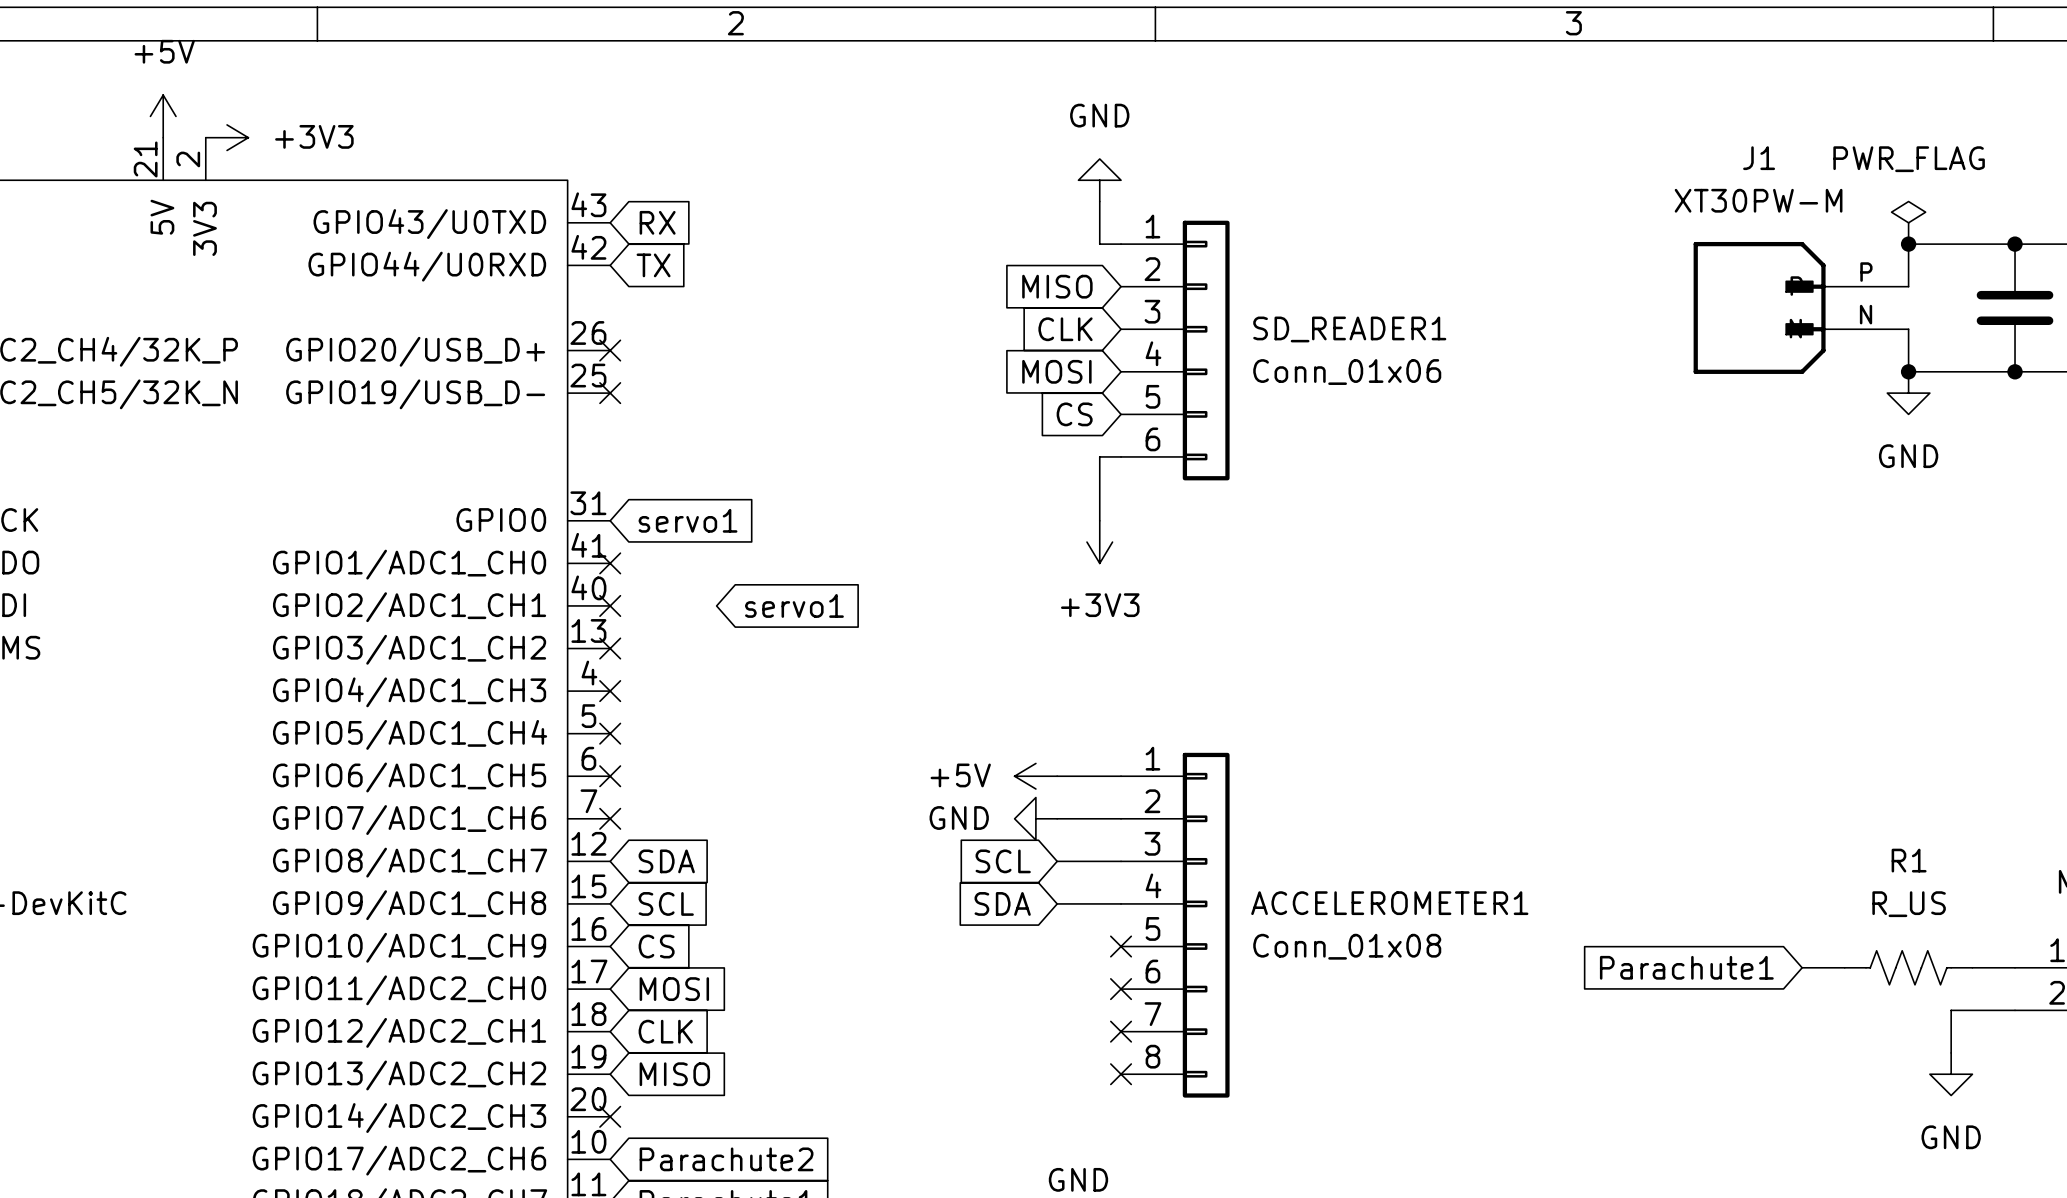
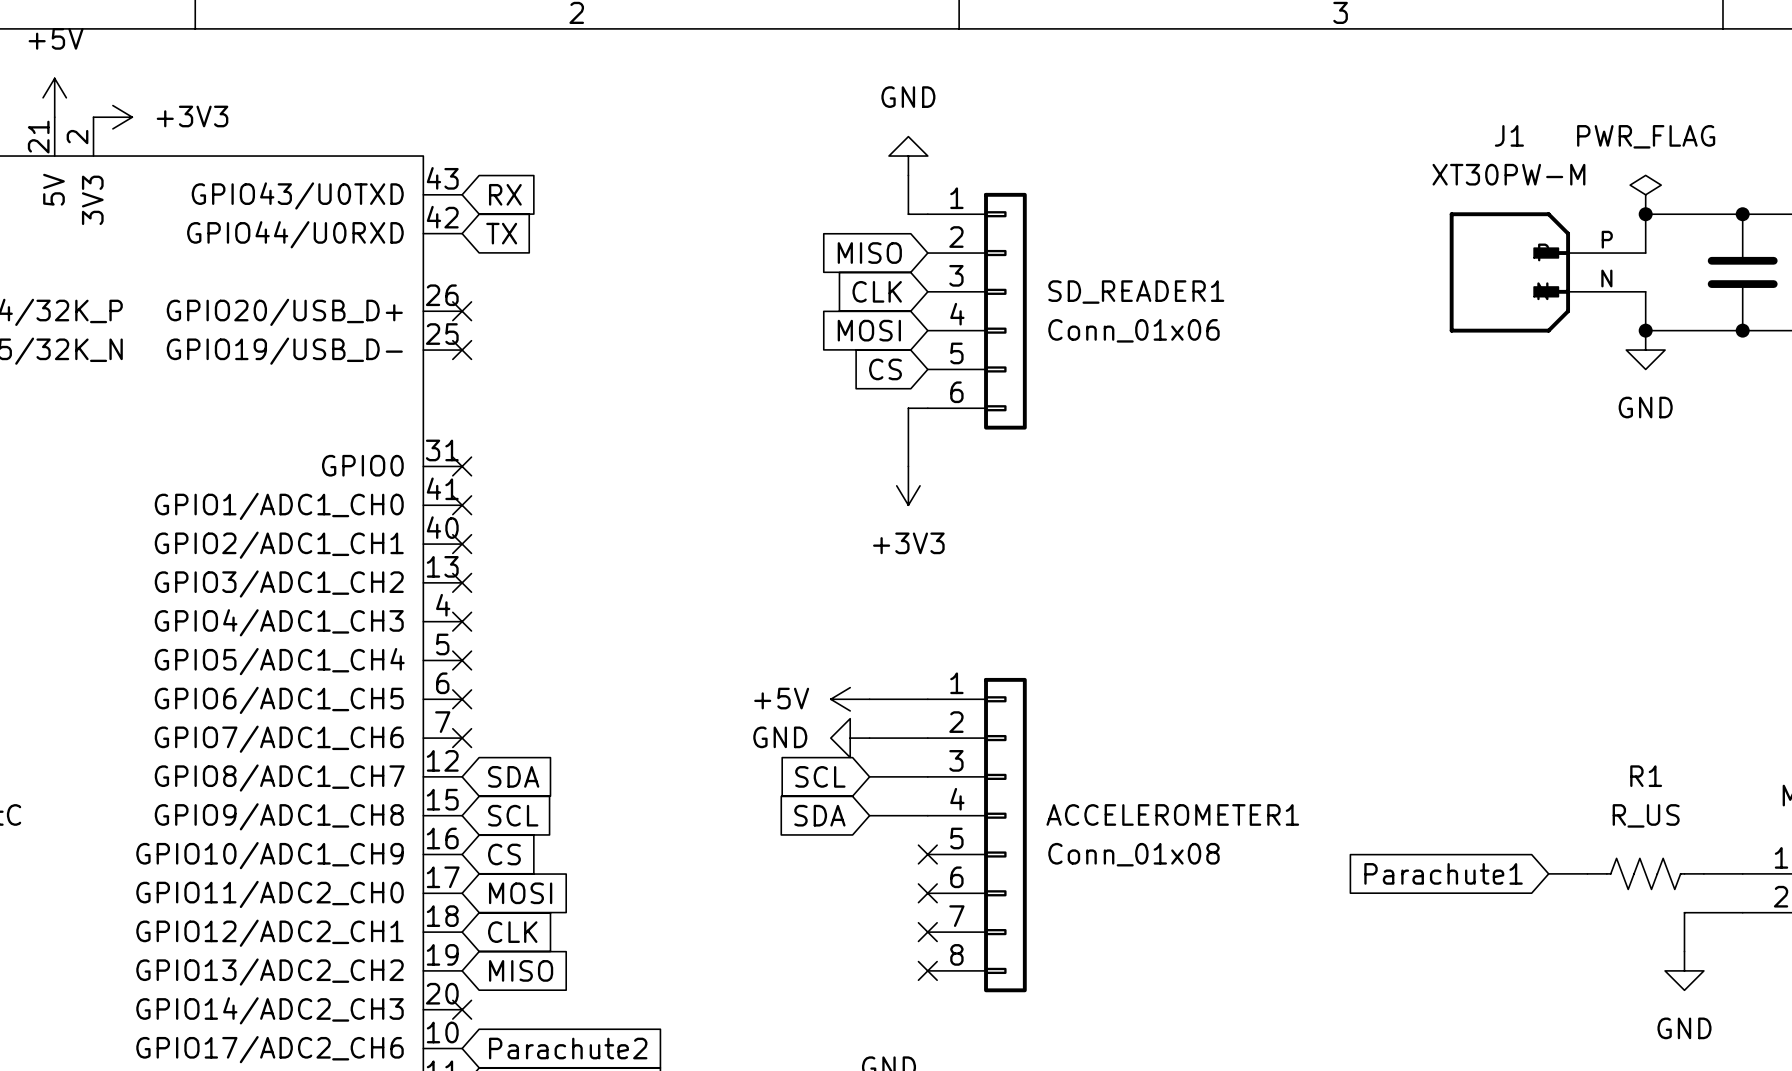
no-connect mark: none -> (462, 466)
global label: servo1 (688, 520) -> none
global label: servo1 (794, 605) -> none

